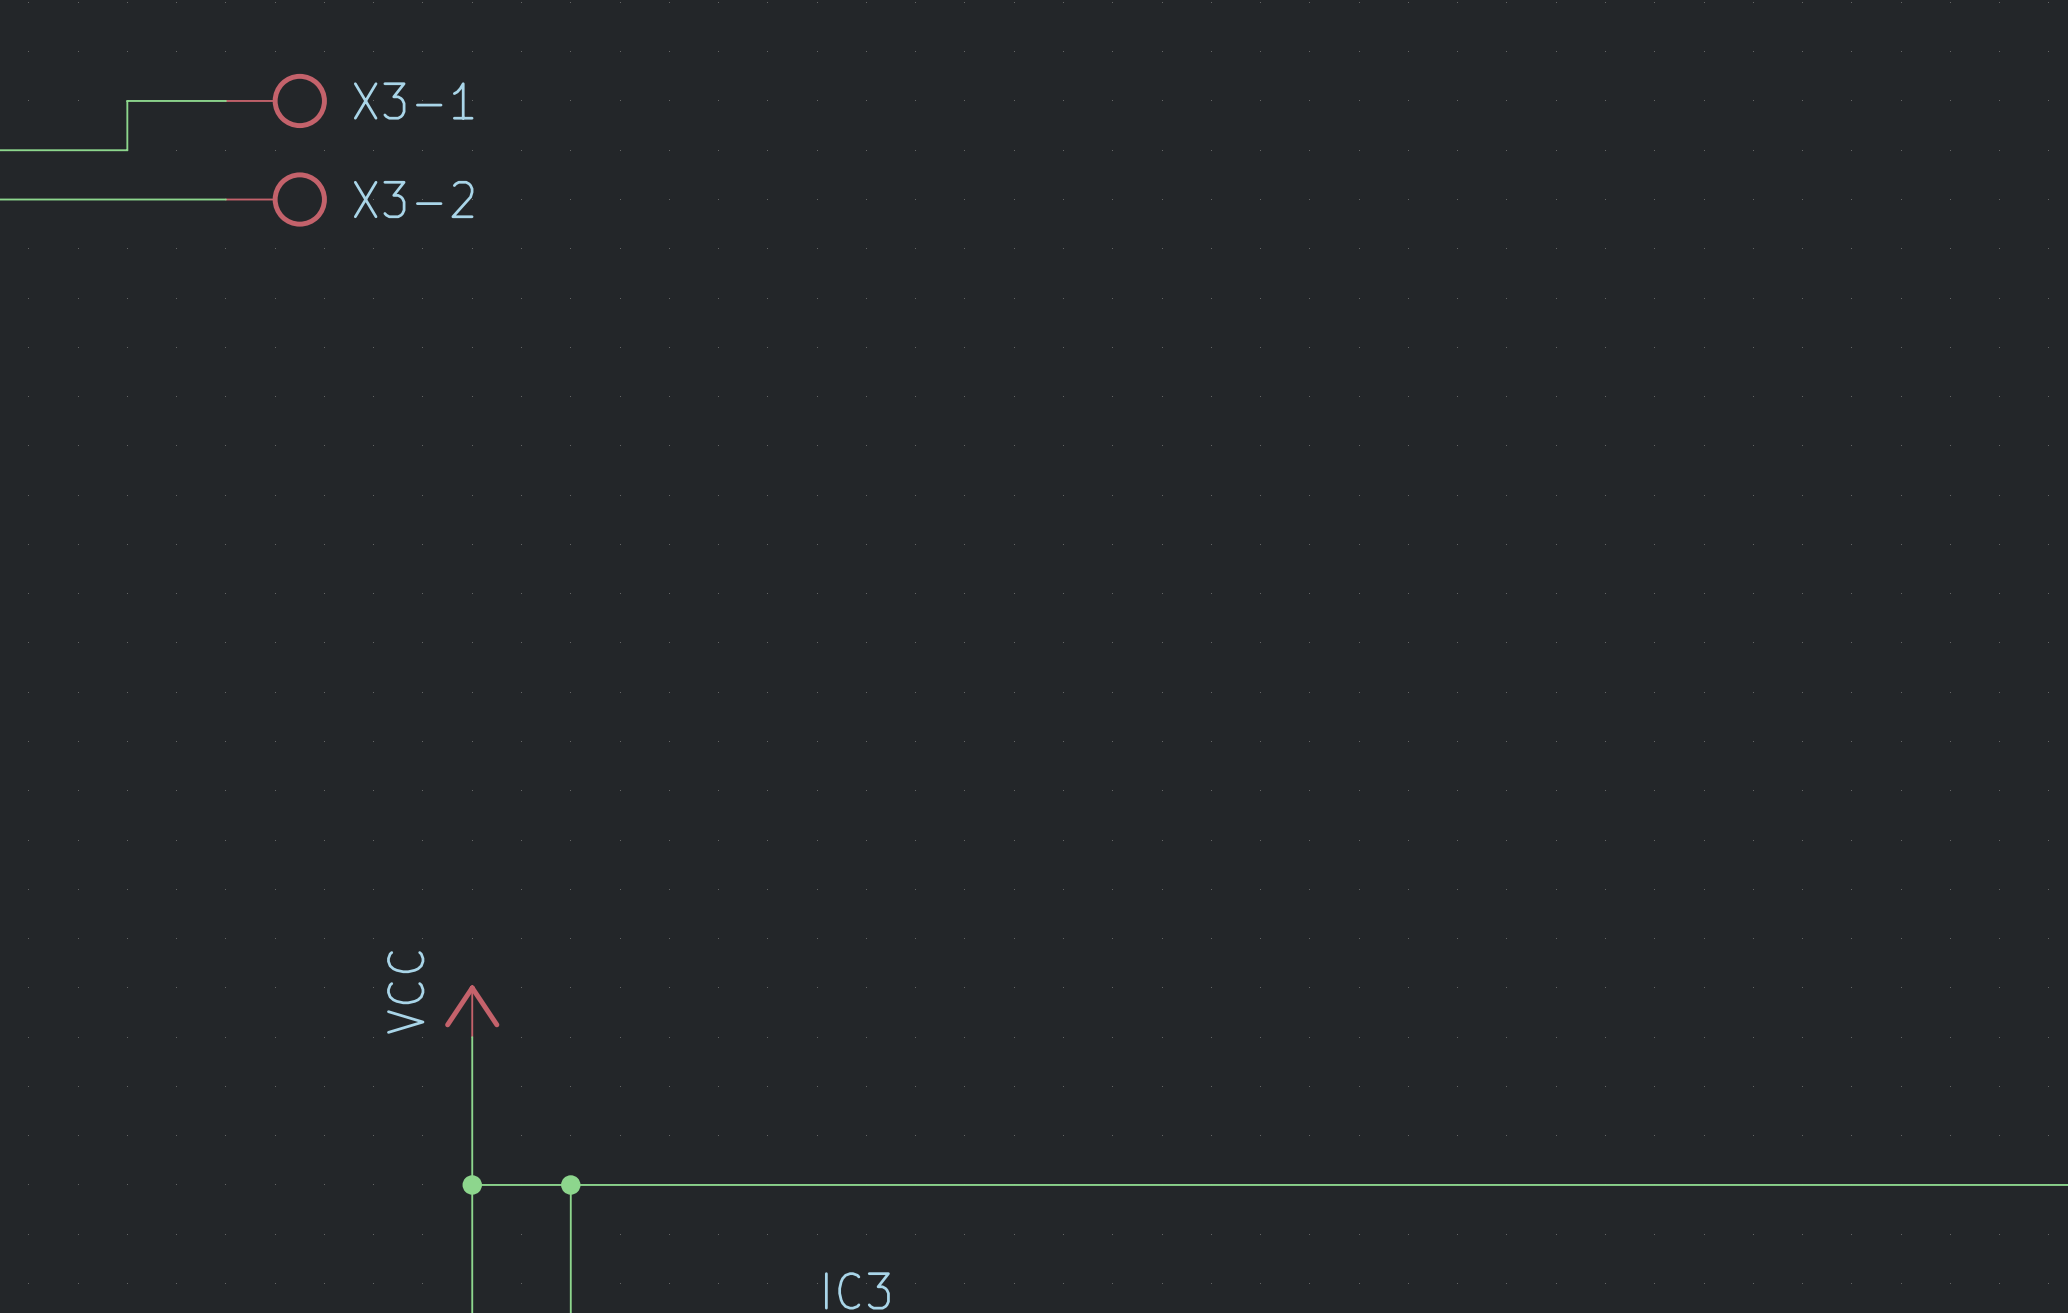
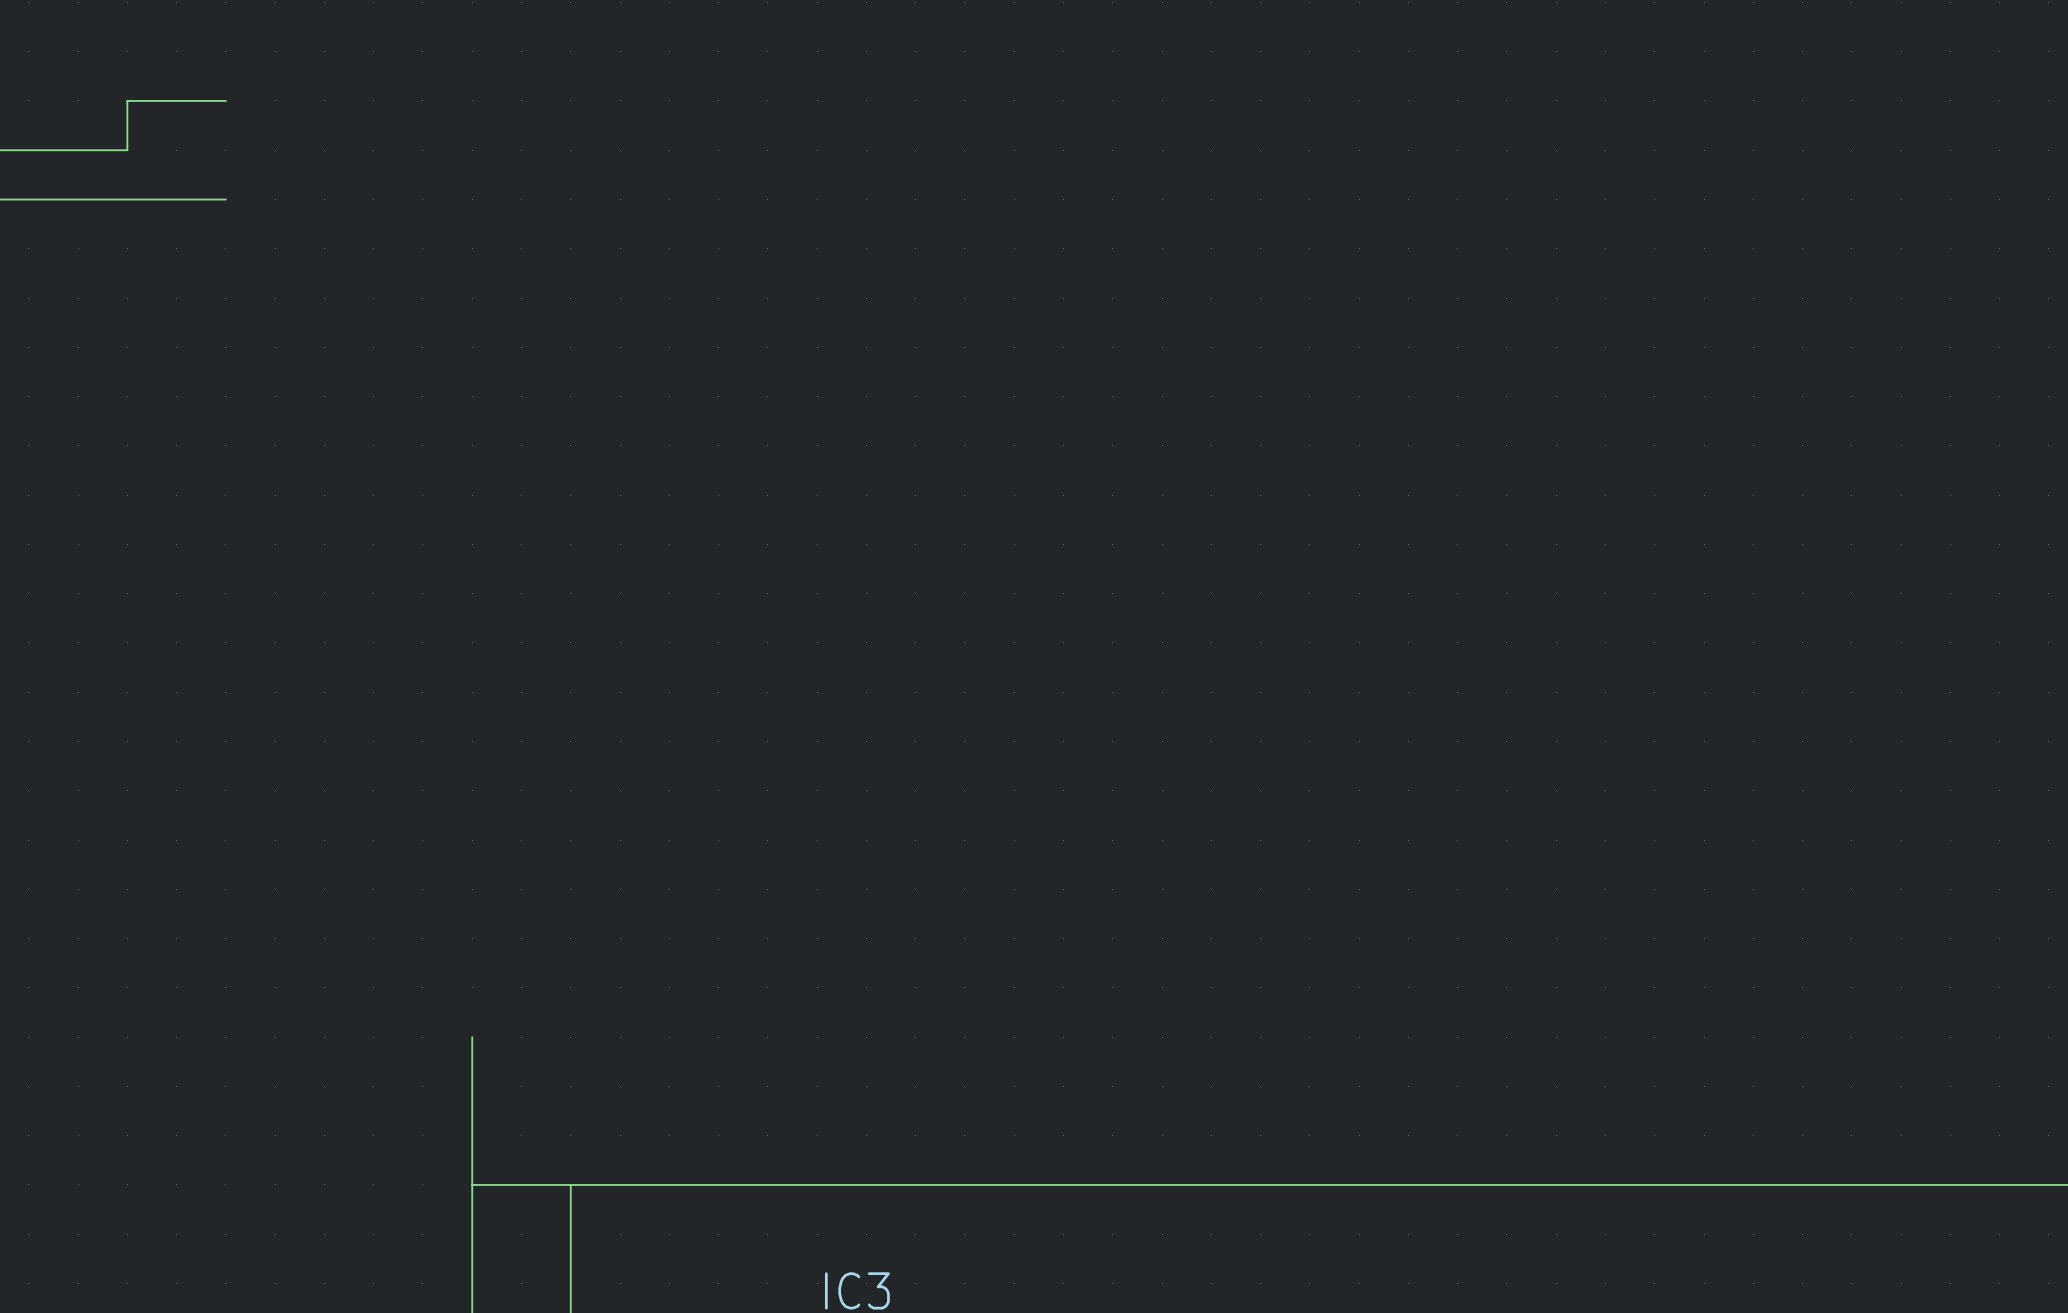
X3-1: (276, 100) -> none
X3-2: (276, 199) -> none
power symbol: VCC (472, 1011) -> none
junction: (472, 1184) -> none
junction: (570, 1184) -> none

